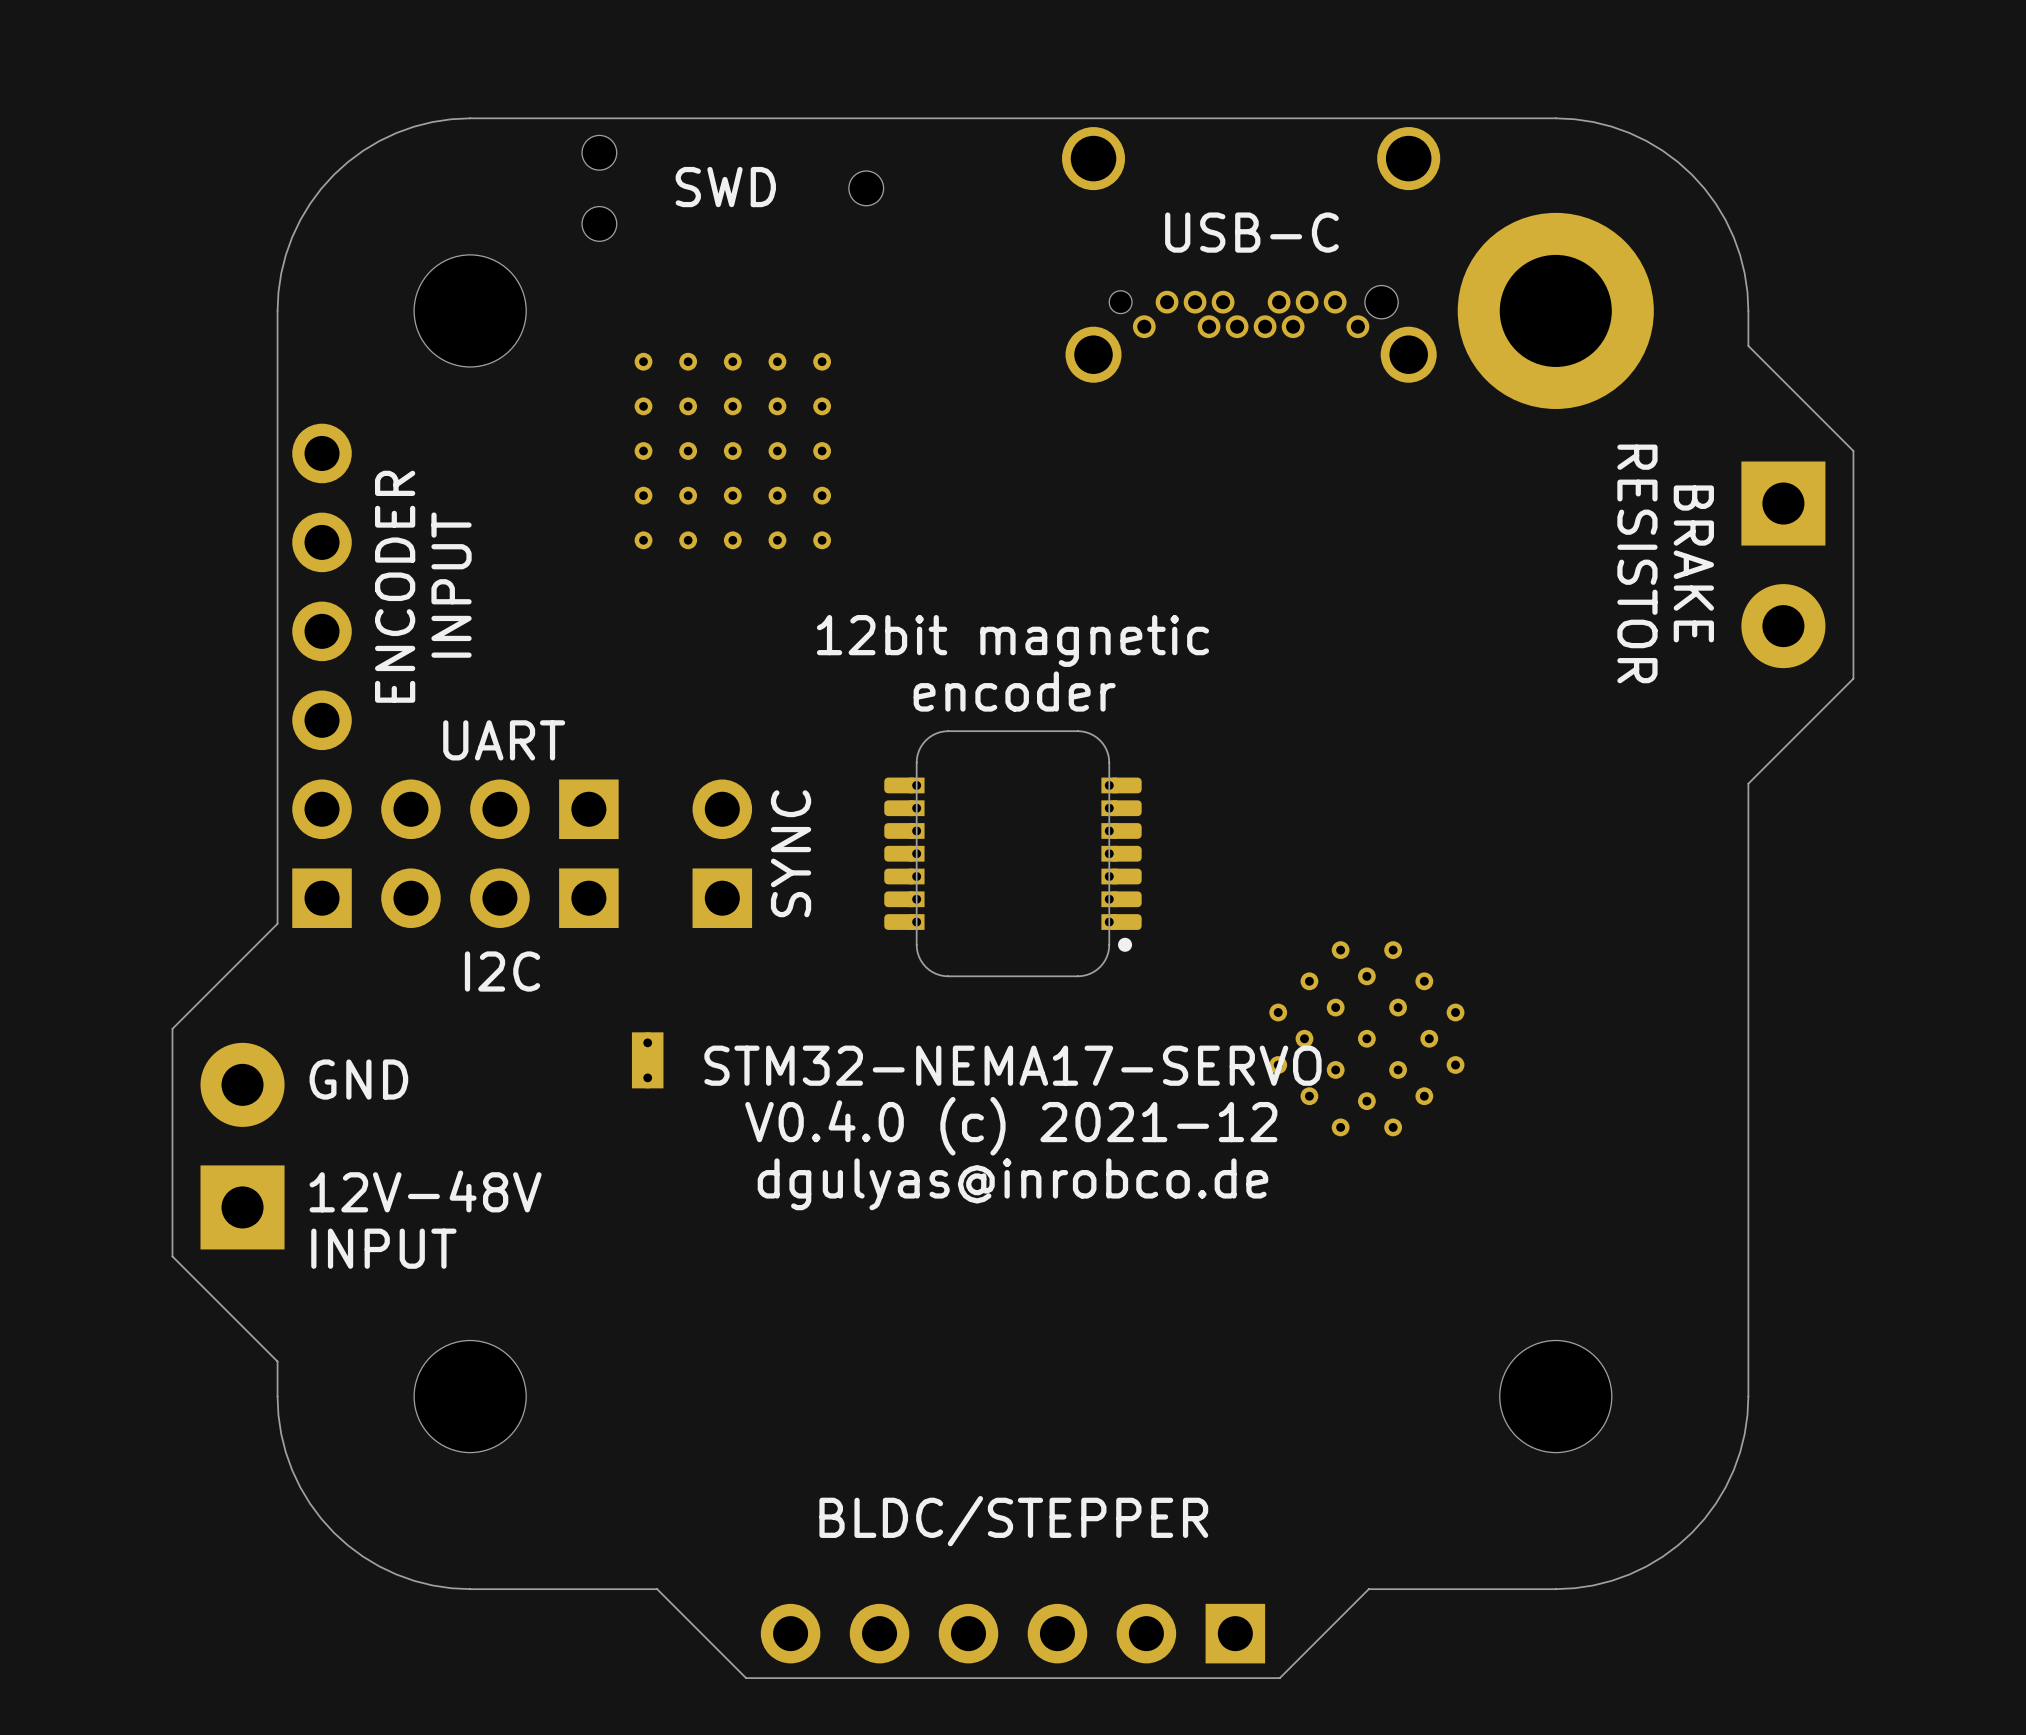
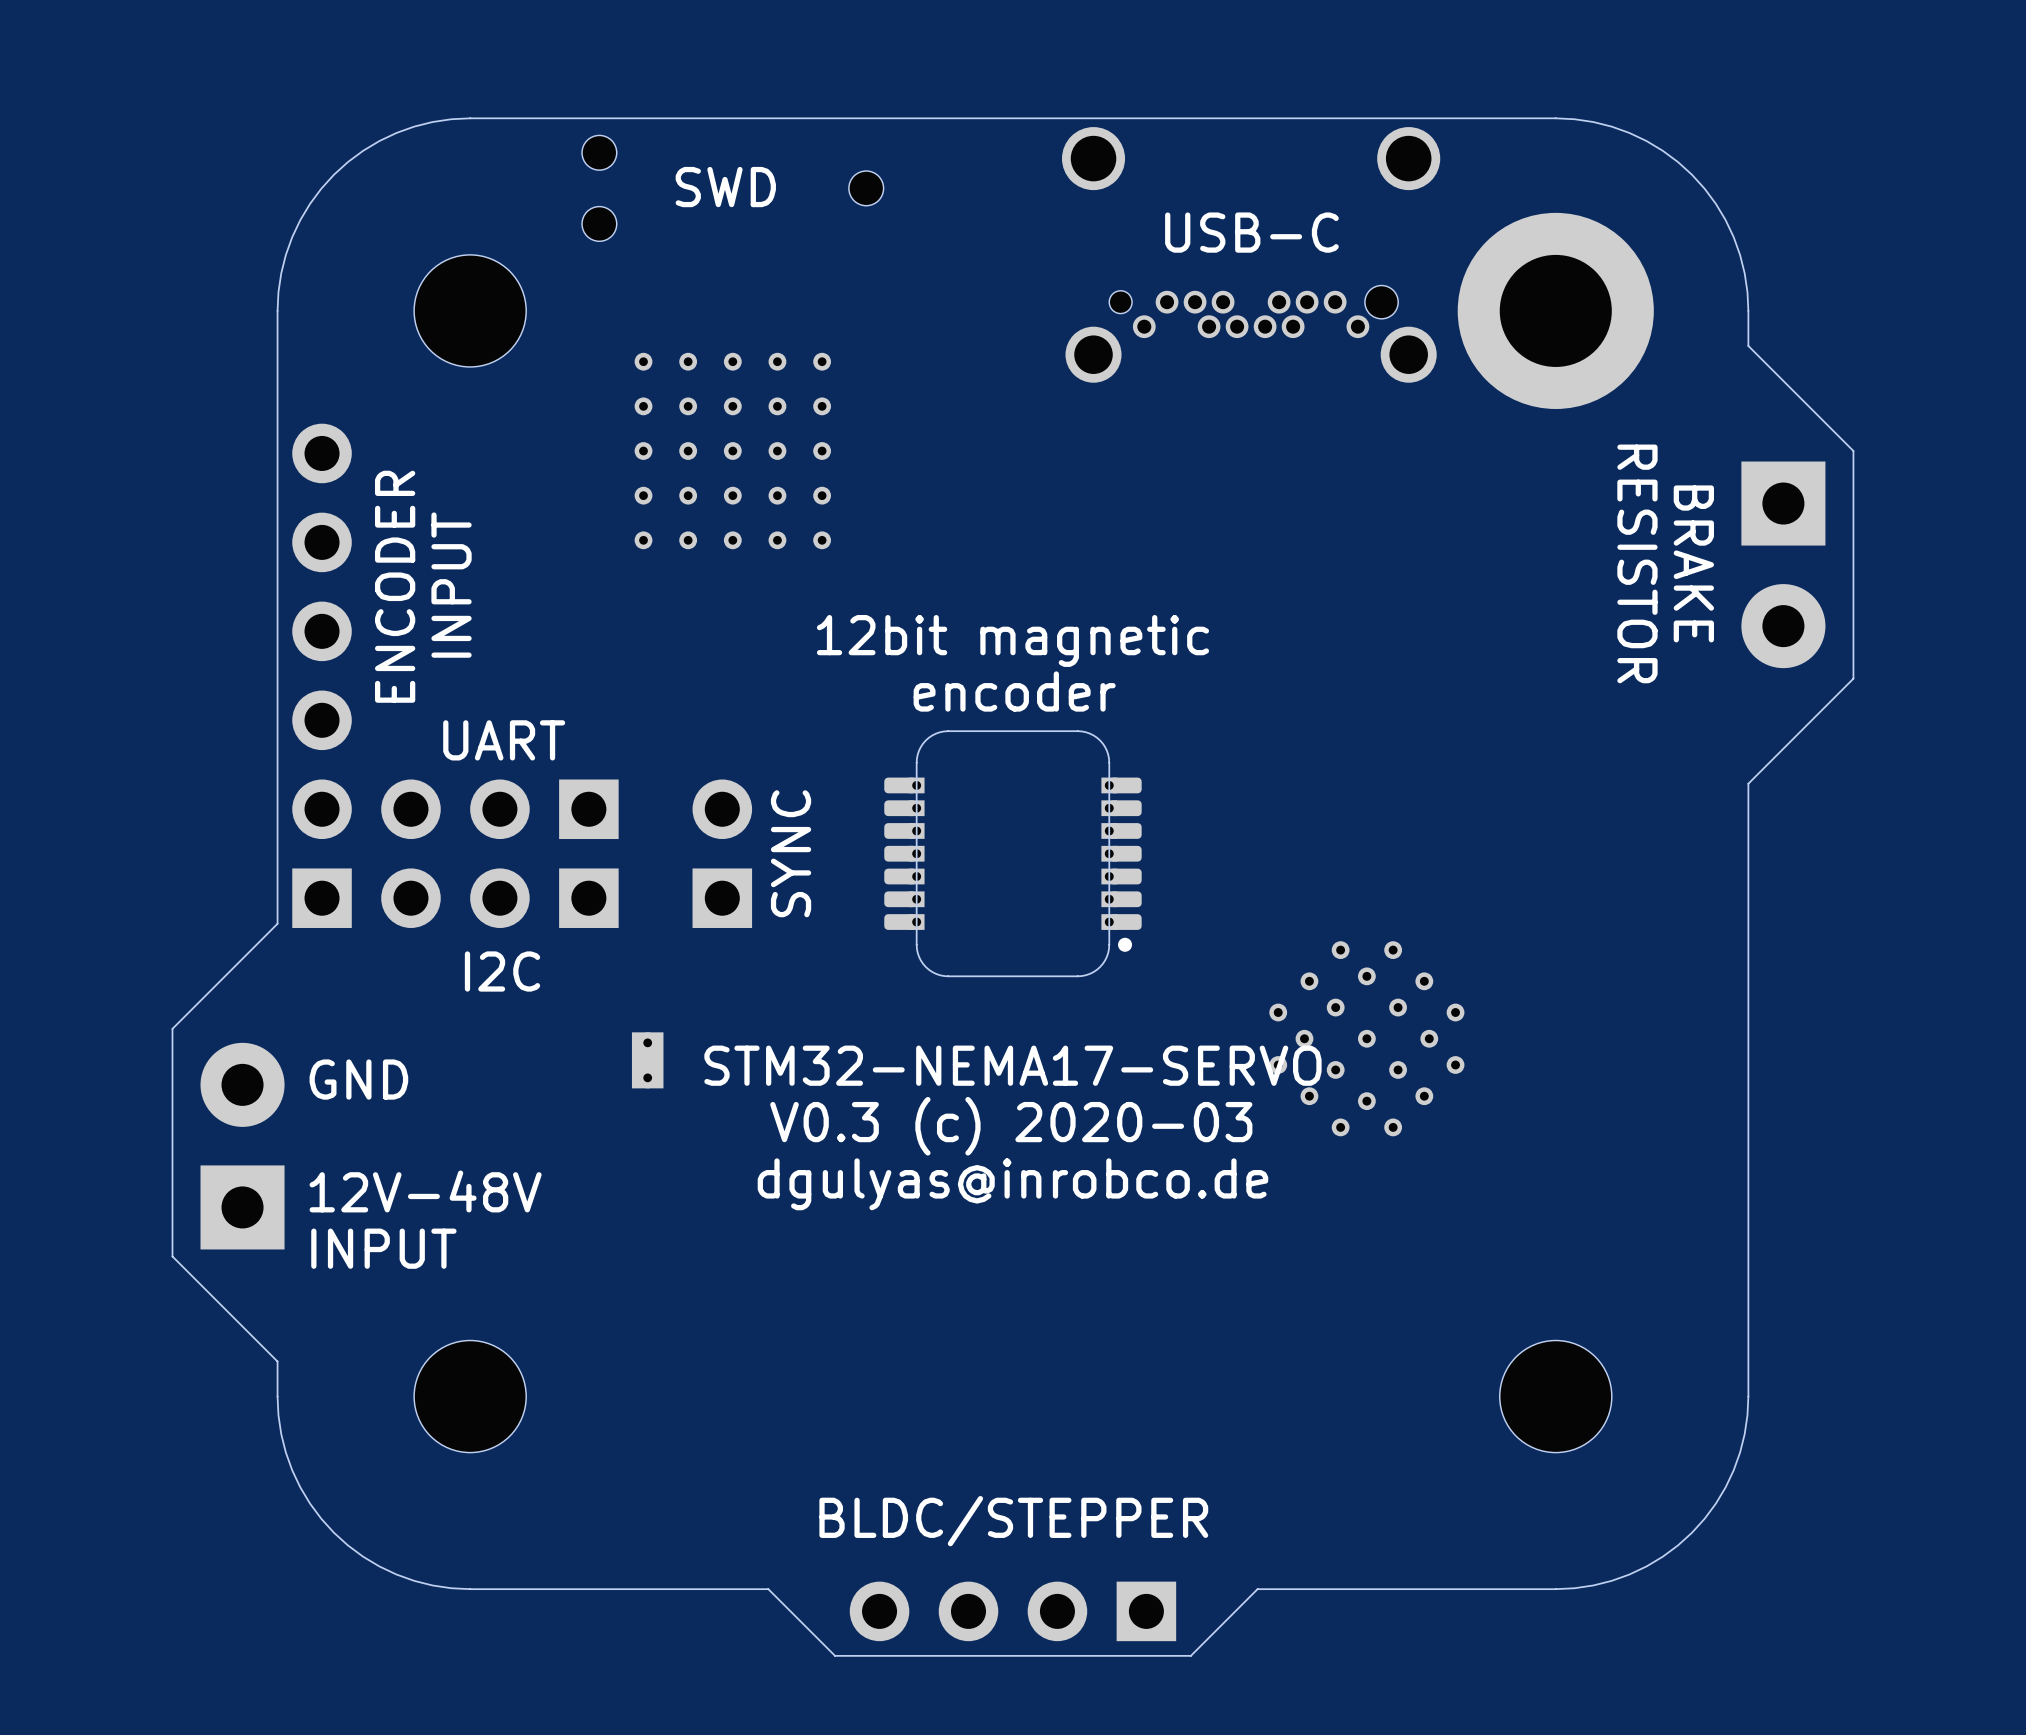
text: V0.4.0 (c) 2021-12 (1011, 1126) -> V0.3 (c) 2020-03 (1011, 1126)
board edge: (1368, 1589) (1279, 1678) (746, 1678) (657, 1589) -> (1368, 1589) (1257, 1589) (1190, 1655) (835, 1655) (768, 1589) (657, 1589)
part footprint: [760, 1603, 1266, 1664] -> [849, 1581, 1177, 1642]

